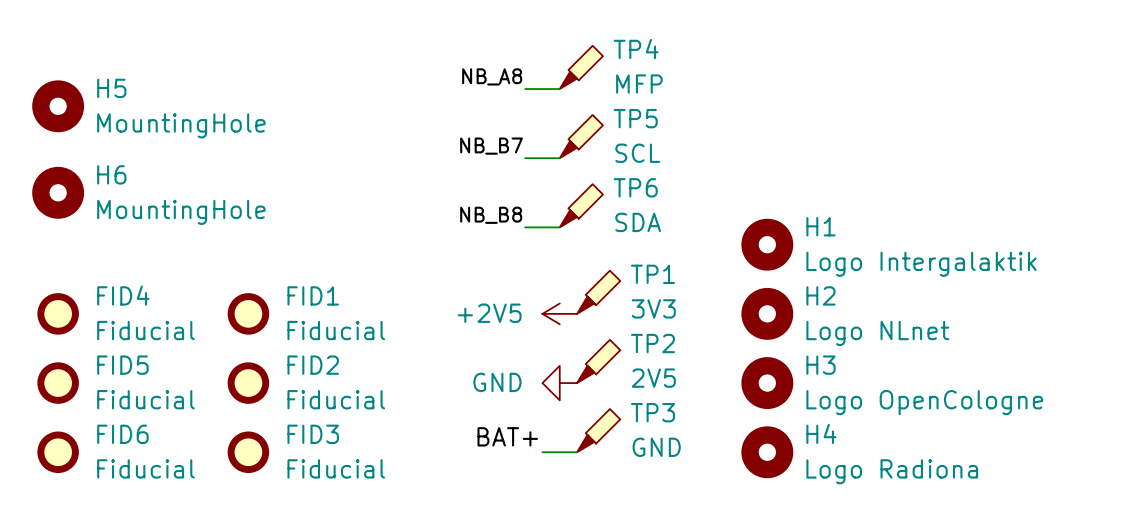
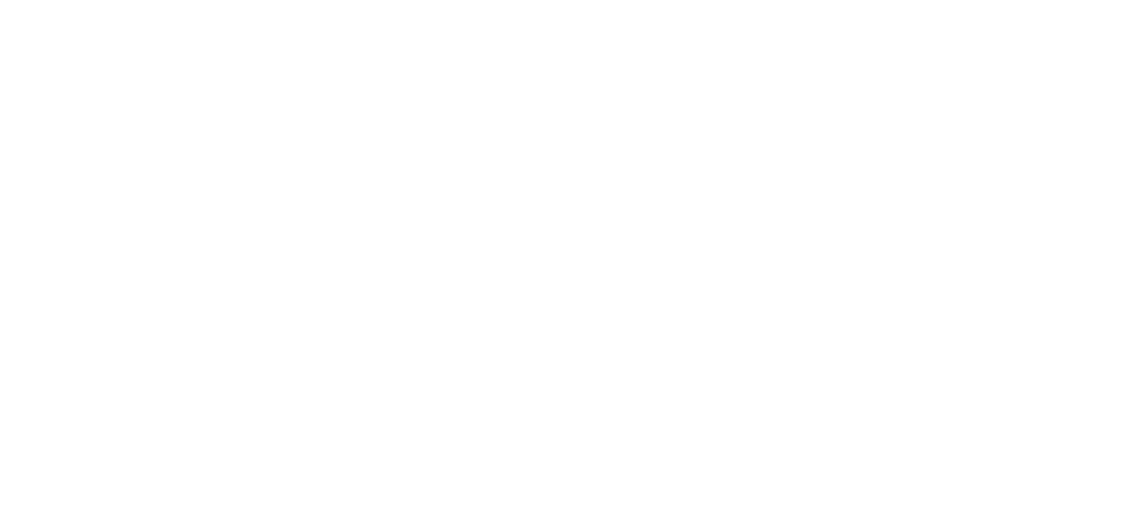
TP4: MFP (581, 67) -> none
label: NB_A8 (492, 76) -> none
wire: (525, 89) (559, 89) -> none
H5: MountingHole (58, 106) -> none
TP5: SCL (581, 136) -> none
label: NB_B7 (491, 146) -> none
wire: (525, 158) (559, 158) -> none
H6: MountingHole (58, 192) -> none
TP6: SDA (581, 205) -> none
label: NB_B8 (491, 215) -> none
wire: (525, 227) (559, 227) -> none
H1: Logo Intergalaktik (767, 244) -> none
TP1: 3V3 (598, 292) -> none
FID4: Fiducial (58, 313) -> none
FID1: Fiducial (248, 313) -> none
power symbol: +2V5 (559, 313) -> none
H2: Logo NLnet (767, 313) -> none
TP2: 2V5 (598, 361) -> none
FID5: Fiducial (58, 383) -> none
FID2: Fiducial (248, 383) -> none
power symbol: GND (559, 383) -> none
H3: Logo OpenCologne (767, 383) -> none
TP3: GND (598, 430) -> none
label: BAT+ (507, 436) -> none
FID6: Fiducial (58, 452) -> none
FID3: Fiducial (248, 452) -> none
wire: (542, 452) (577, 452) -> none
H4: Logo Radiona (767, 452) -> none

